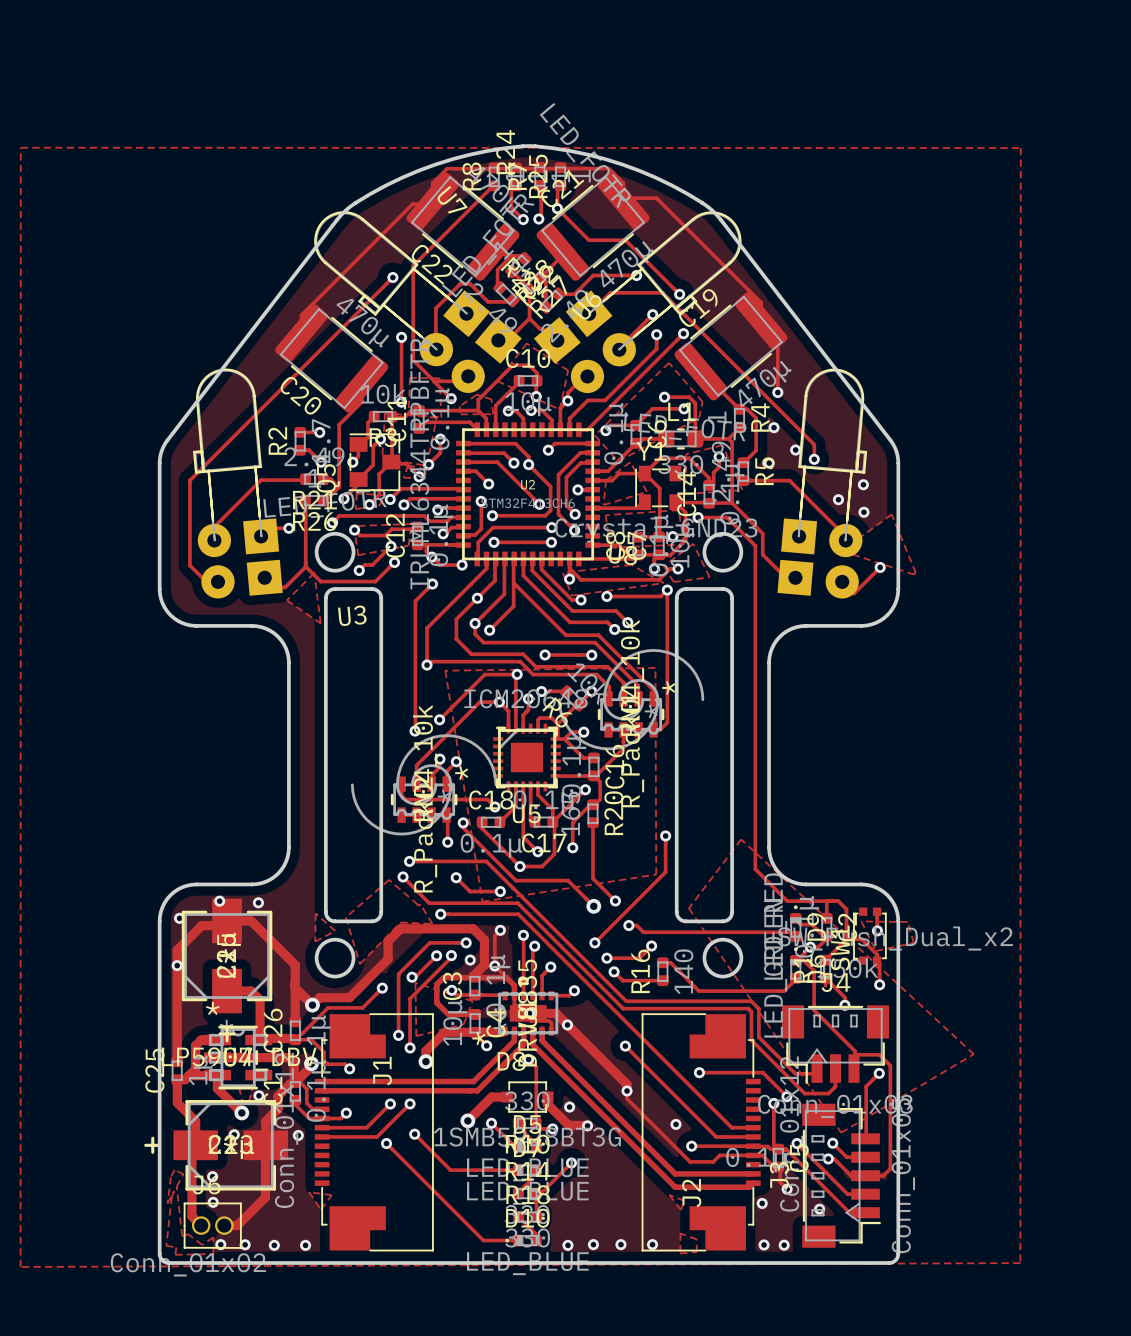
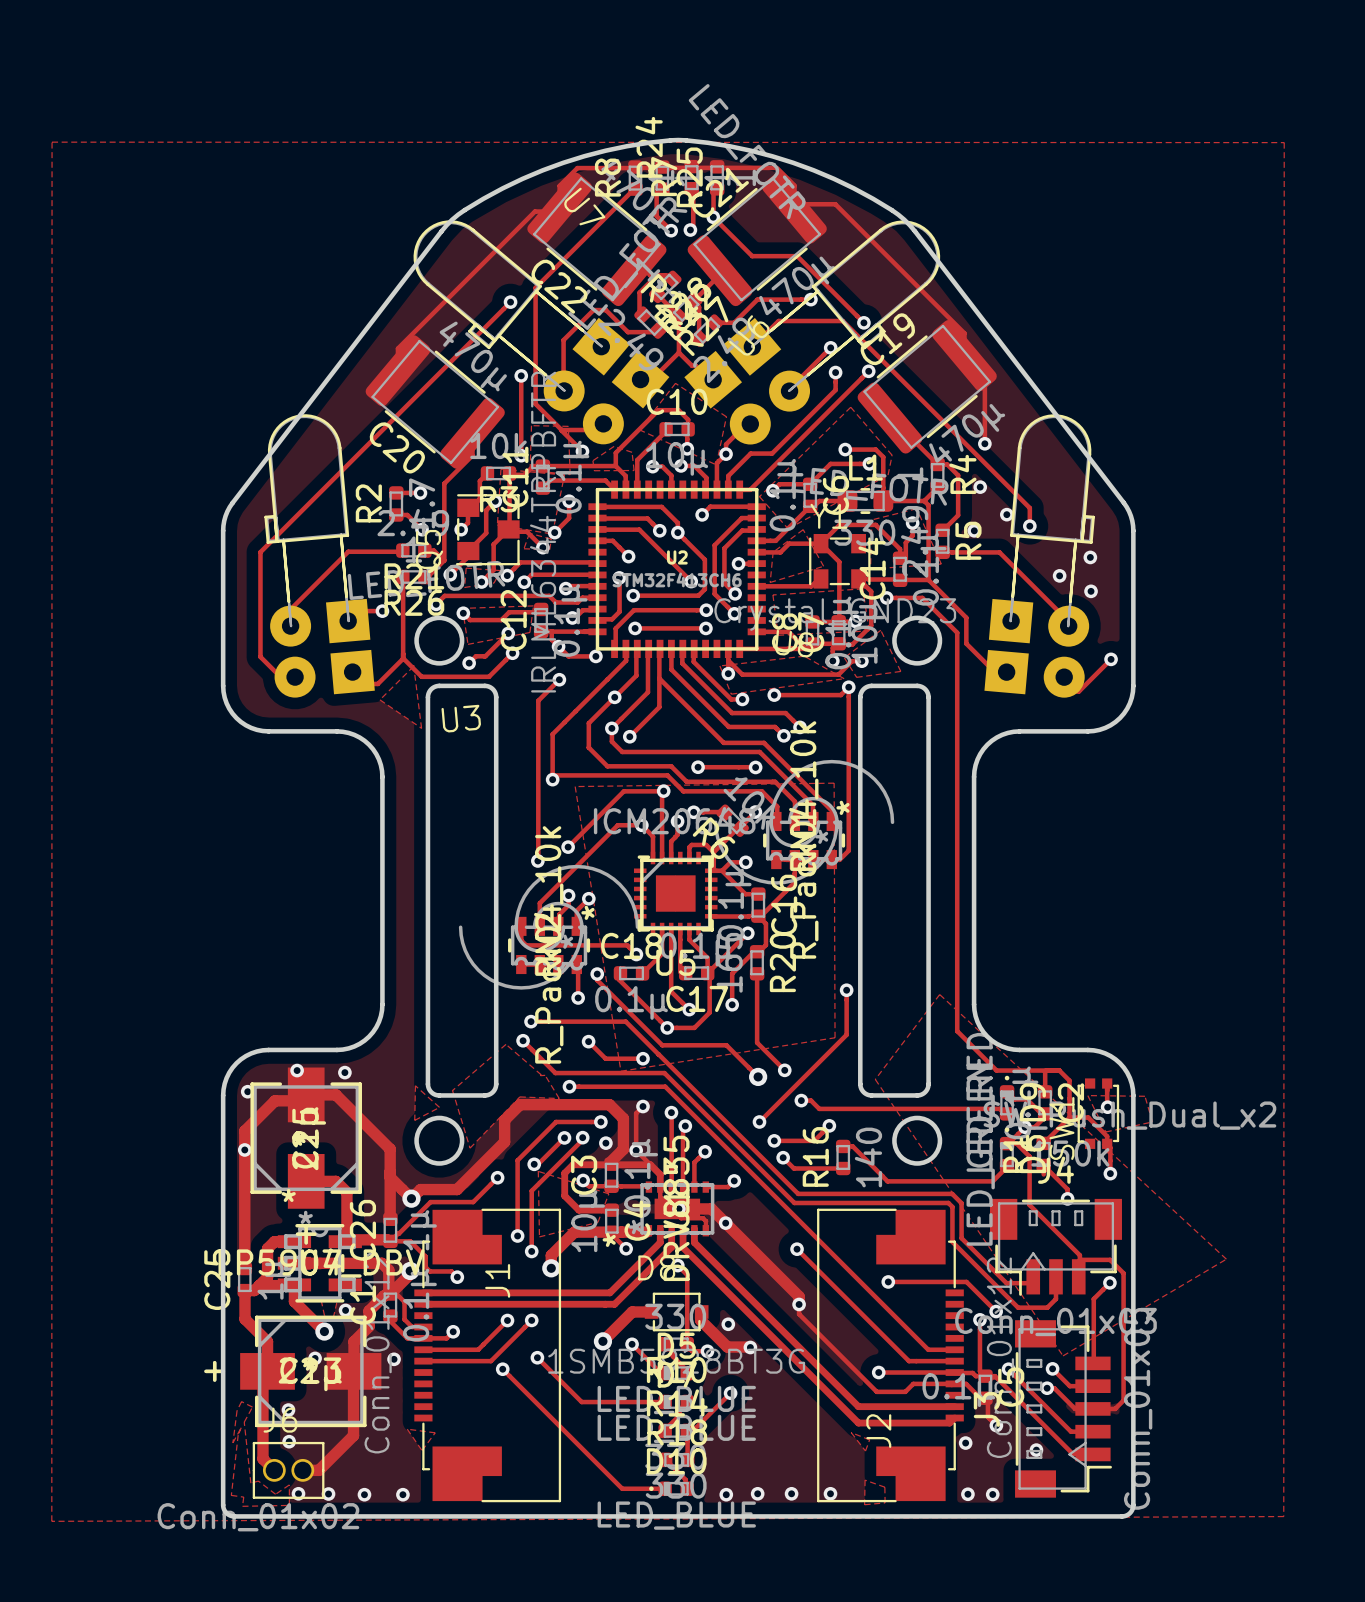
zone outline: (891, 514) (915, 572) (913, 574) (841, 550) (891, 514) -> none
via: (675, 1124) -> none

